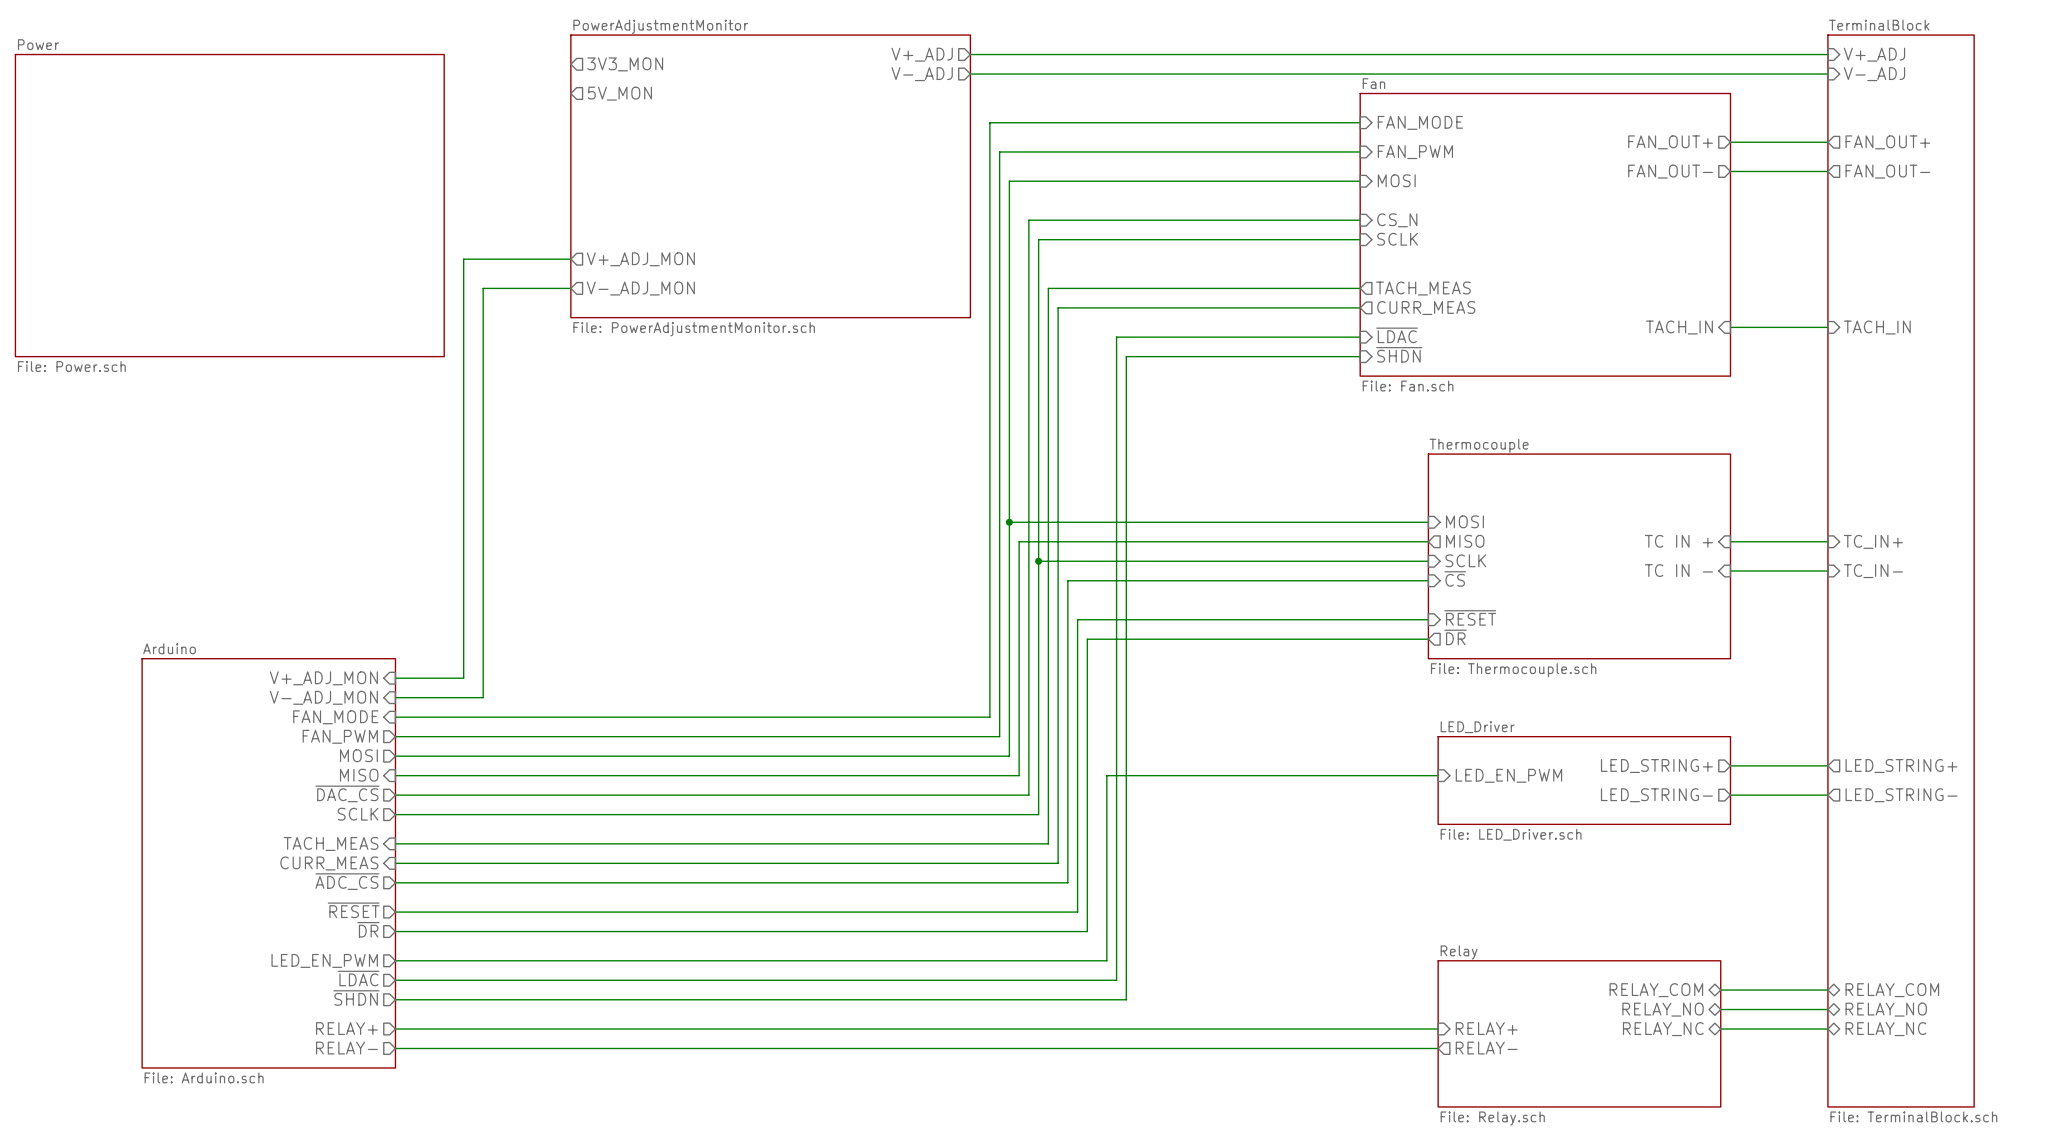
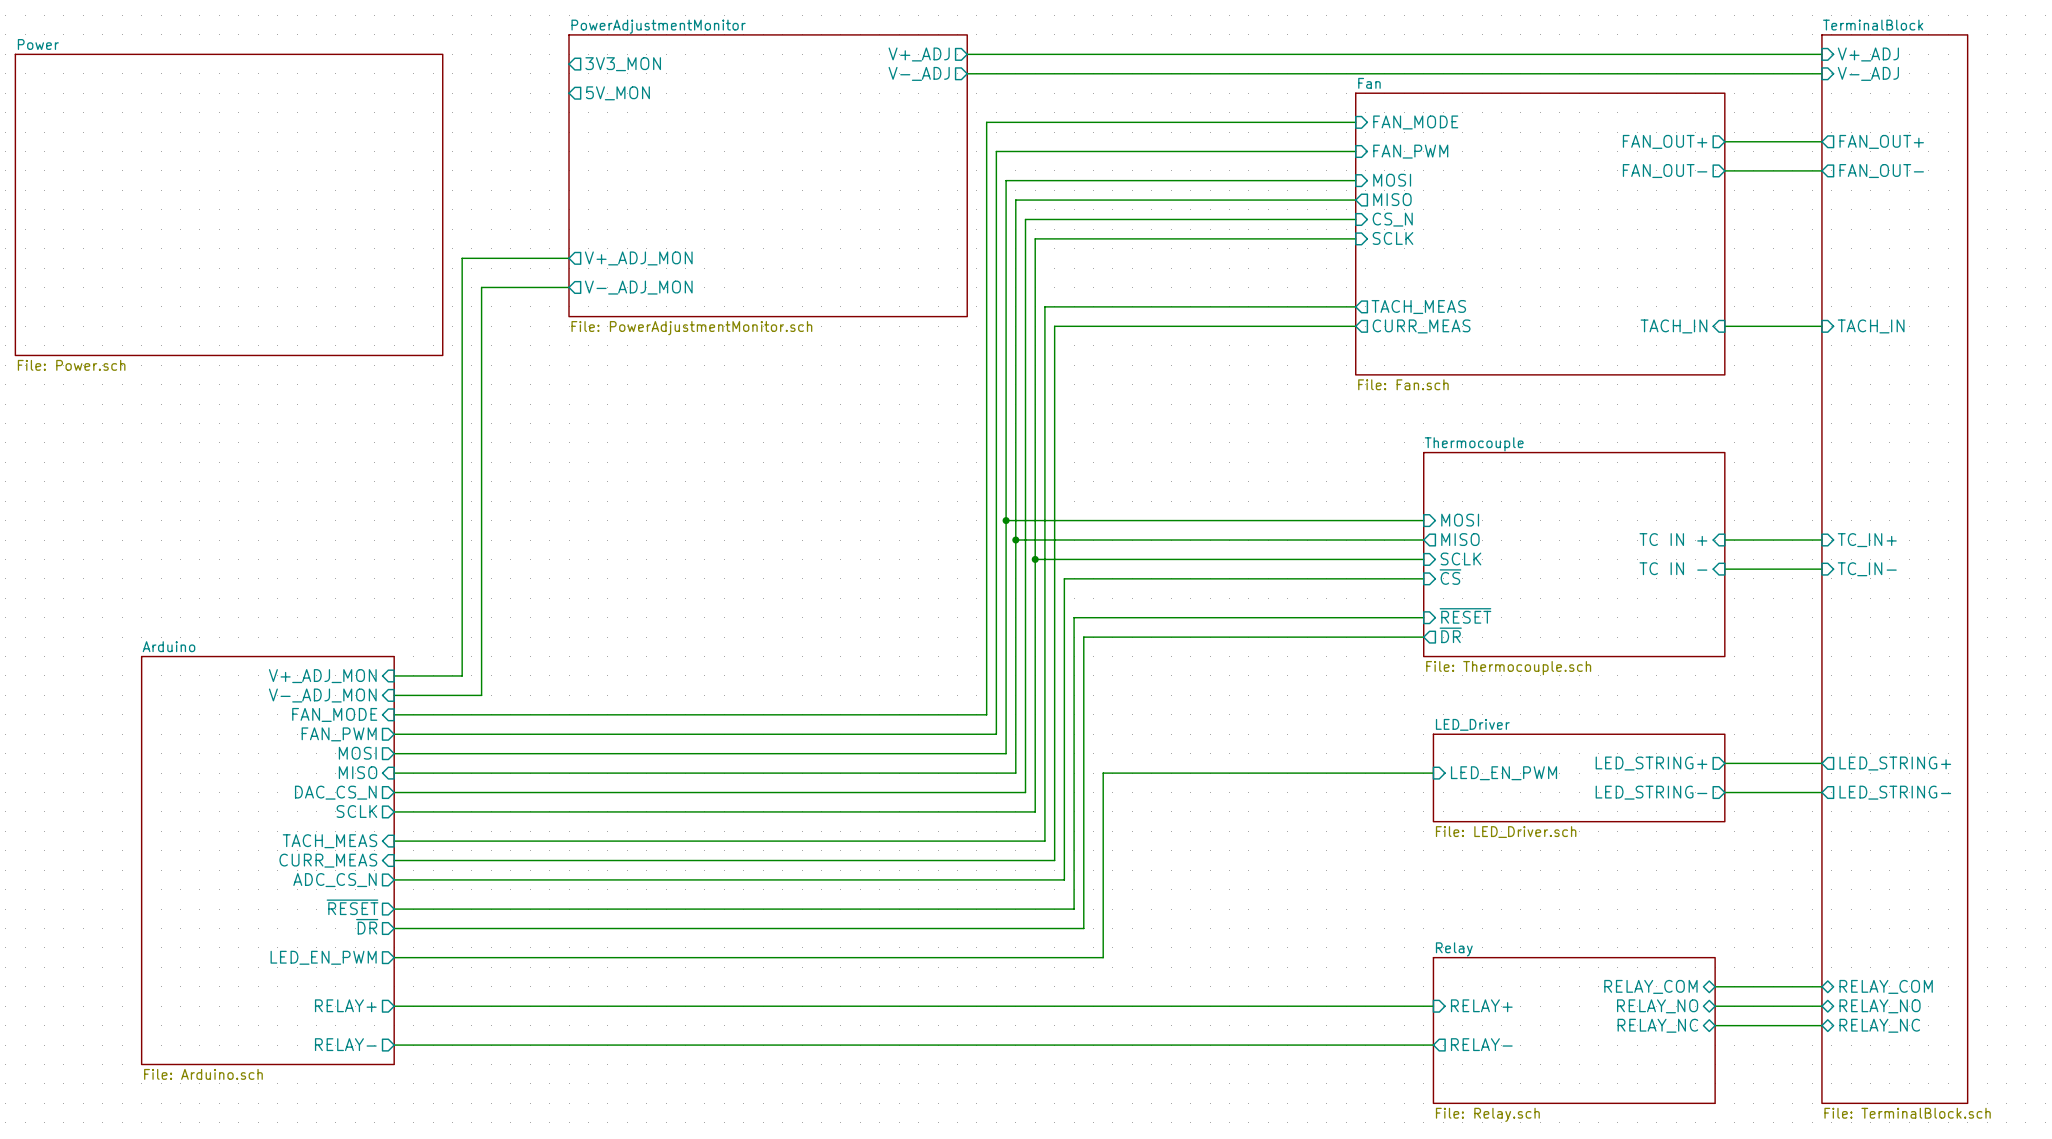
wire: none -> (1355, 200) (1015, 200) (1015, 540)
sheet pin: none -> MISO (1392, 199)
wire: (1360, 288) (1048, 288) (1048, 307) -> none
sheet pin: TACH_MEAS (1423, 288) -> none
wire: (1058, 307) (1058, 327) -> (1054, 306) (1044, 306)
sheet pin: CURR_MEAS (1426, 308) -> TACH_MEAS (1418, 307)
wire: none -> (1054, 326) (1355, 326)
sheet pin: none -> CURR_MEAS (1421, 326)
sheet pin: ~{LDAC} (1397, 335) -> none
wire: (1360, 337) (1116, 337) (1116, 980) (395, 980) -> none
sheet pin: ~{SHDN} (1399, 354) -> none
wire: (1360, 356) (1126, 356) (1126, 999) (395, 999) -> none
junction: none -> (1015, 540)
sheet pin: ~{DAC_CS} (347, 793) -> DAC_CS_N (335, 792)
sheet pin: ~{ADC_CS} (347, 881) -> ADC_CS_N (334, 880)
sheet pin: ~{LDAC} (358, 978) -> none
sheet pin: ~{SHDN} (356, 997) -> none
sheet pin position: RELAY+ (346, 1028) -> RELAY+ (345, 1005)
sheet pin position: RELAY+ (1486, 1028) -> RELAY+ (1481, 1005)
wire: (395, 1029) (1438, 1029) -> (394, 1006) (1433, 1006)

